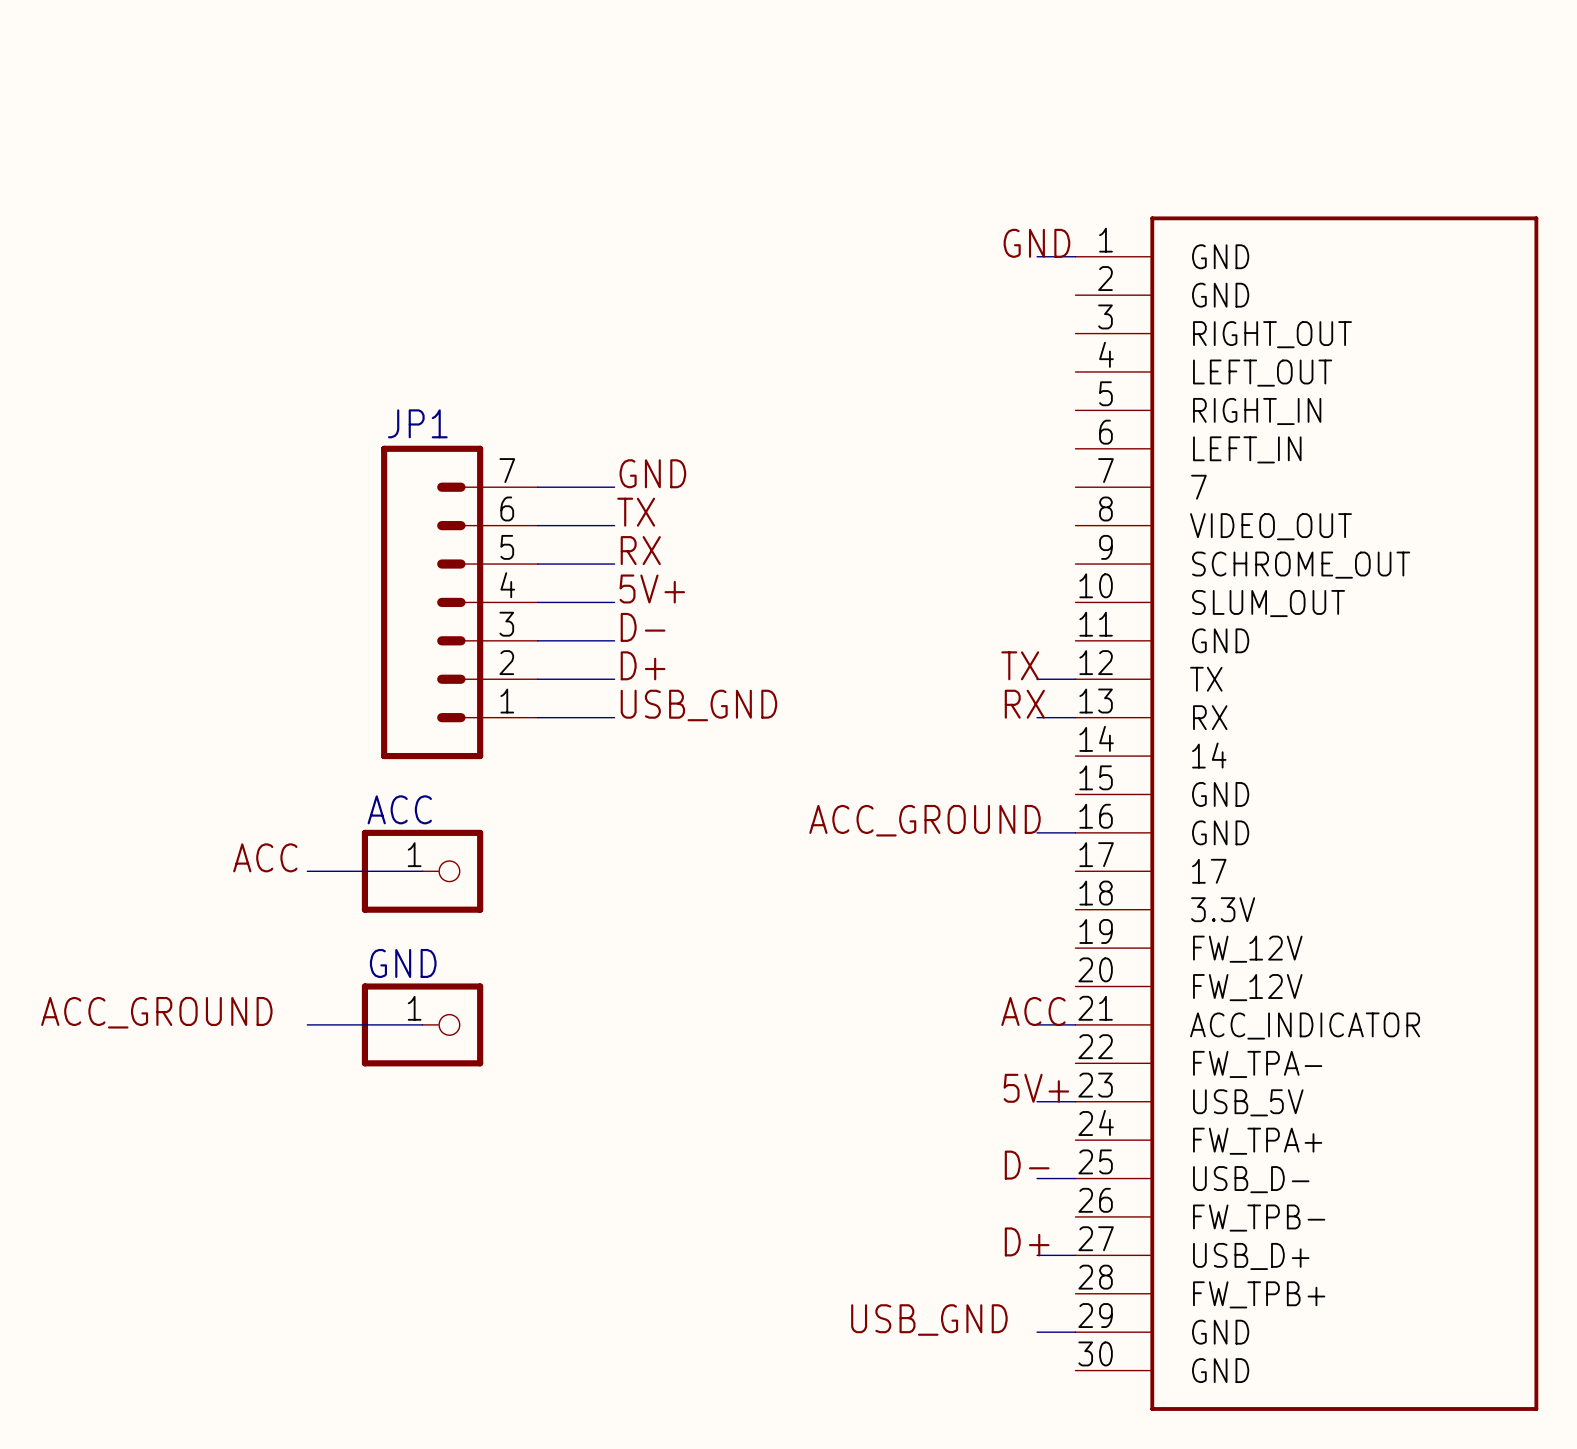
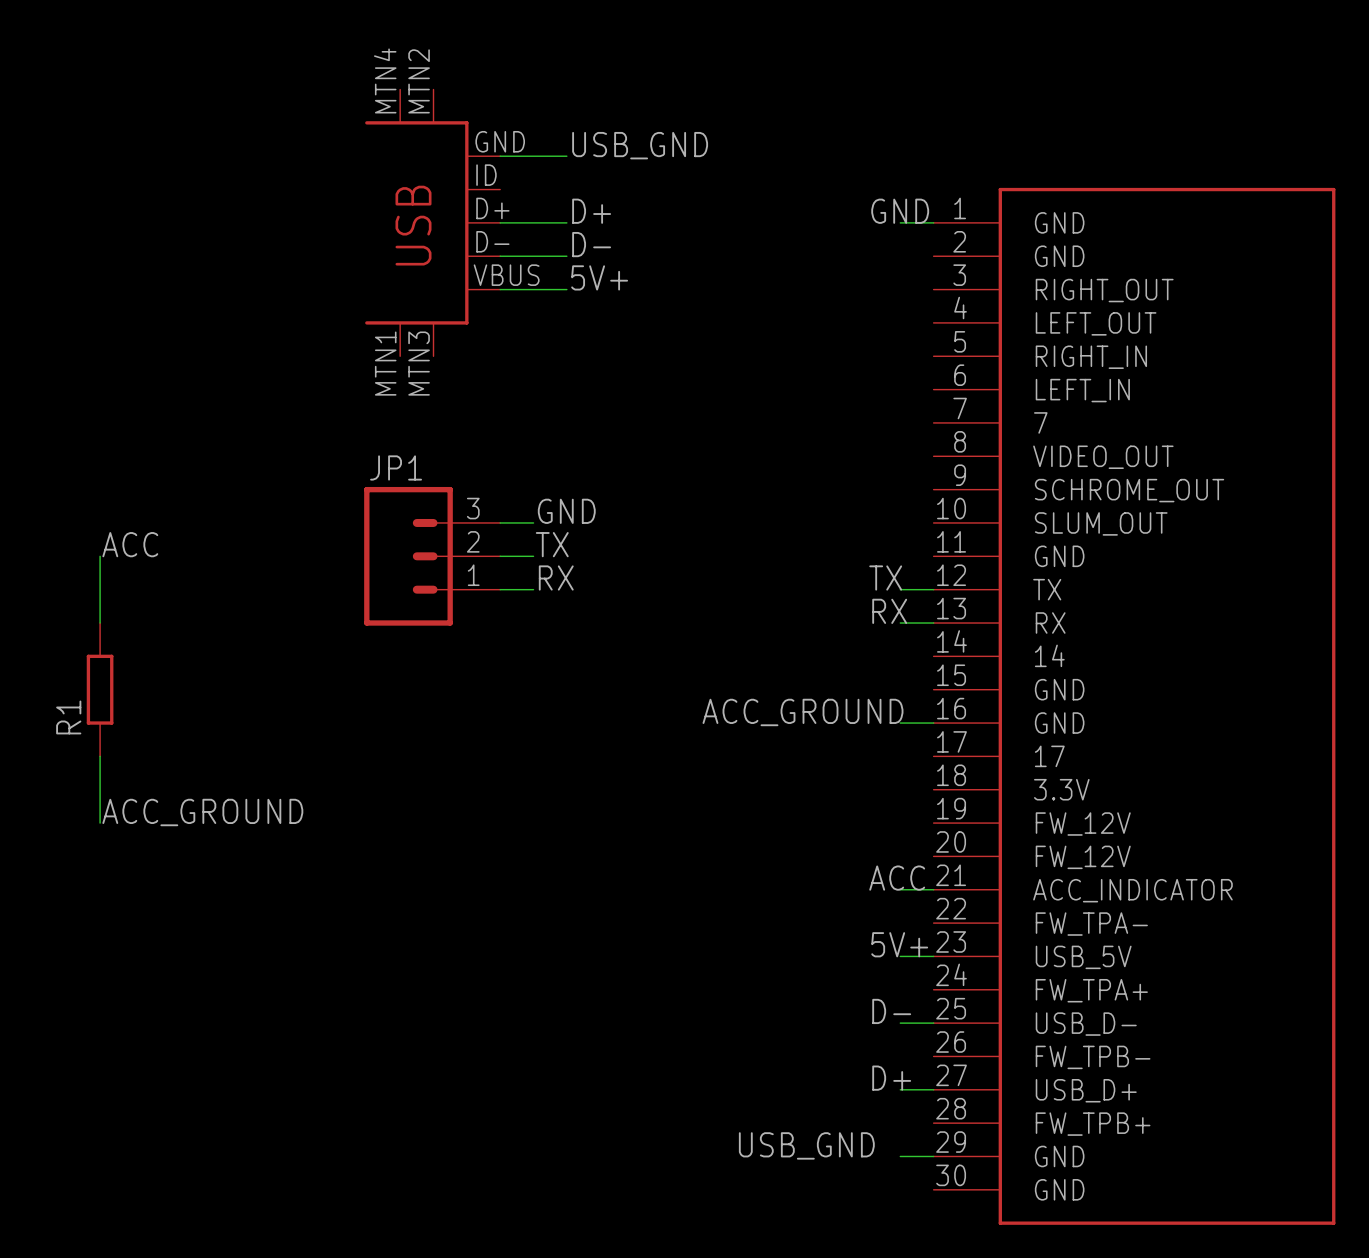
label: none -> USB_GND (640, 145)
wire: none -> (500, 156) (566, 156)
label: none -> D+ (591, 211)
part: none -> (432, 222)
label: none -> D- (591, 244)
label: none -> 5V+ (599, 277)
JP1 name position: JP1 (417, 423) -> JP1 (396, 467)
JP1 symbol: [381, 445, 538, 760] -> [364, 486, 501, 626]
label: GND (652, 473) -> none
wire: (537, 487) (614, 487) -> (500, 222) (566, 222)
label: TX (636, 512) -> none
wire: (537, 525) (614, 525) -> (500, 256) (566, 256)
label: RX (640, 550) -> none
wire: (537, 564) (614, 564) -> (500, 289) (566, 289)
label: 5V+ (652, 588) -> GND (566, 511)
label: D- (643, 627) -> TX (552, 544)
wire: none -> (100, 556) (100, 623)
label: D+ (643, 665) -> RX (556, 577)
label: USB_GND (698, 705) -> none
wire: (537, 717) (614, 717) -> none
R1: none -> (100, 689)
label position: ACC (265, 857) -> ACC (130, 544)
wire: none -> (100, 756) (100, 823)
wire: (307, 871) (422, 871) -> none
ACC: (422, 871) -> none
label position: ACC_GROUND (156, 1012) -> ACC_GROUND (202, 812)
wire: (307, 1024) (422, 1024) -> none
GND: (422, 1024) -> none

